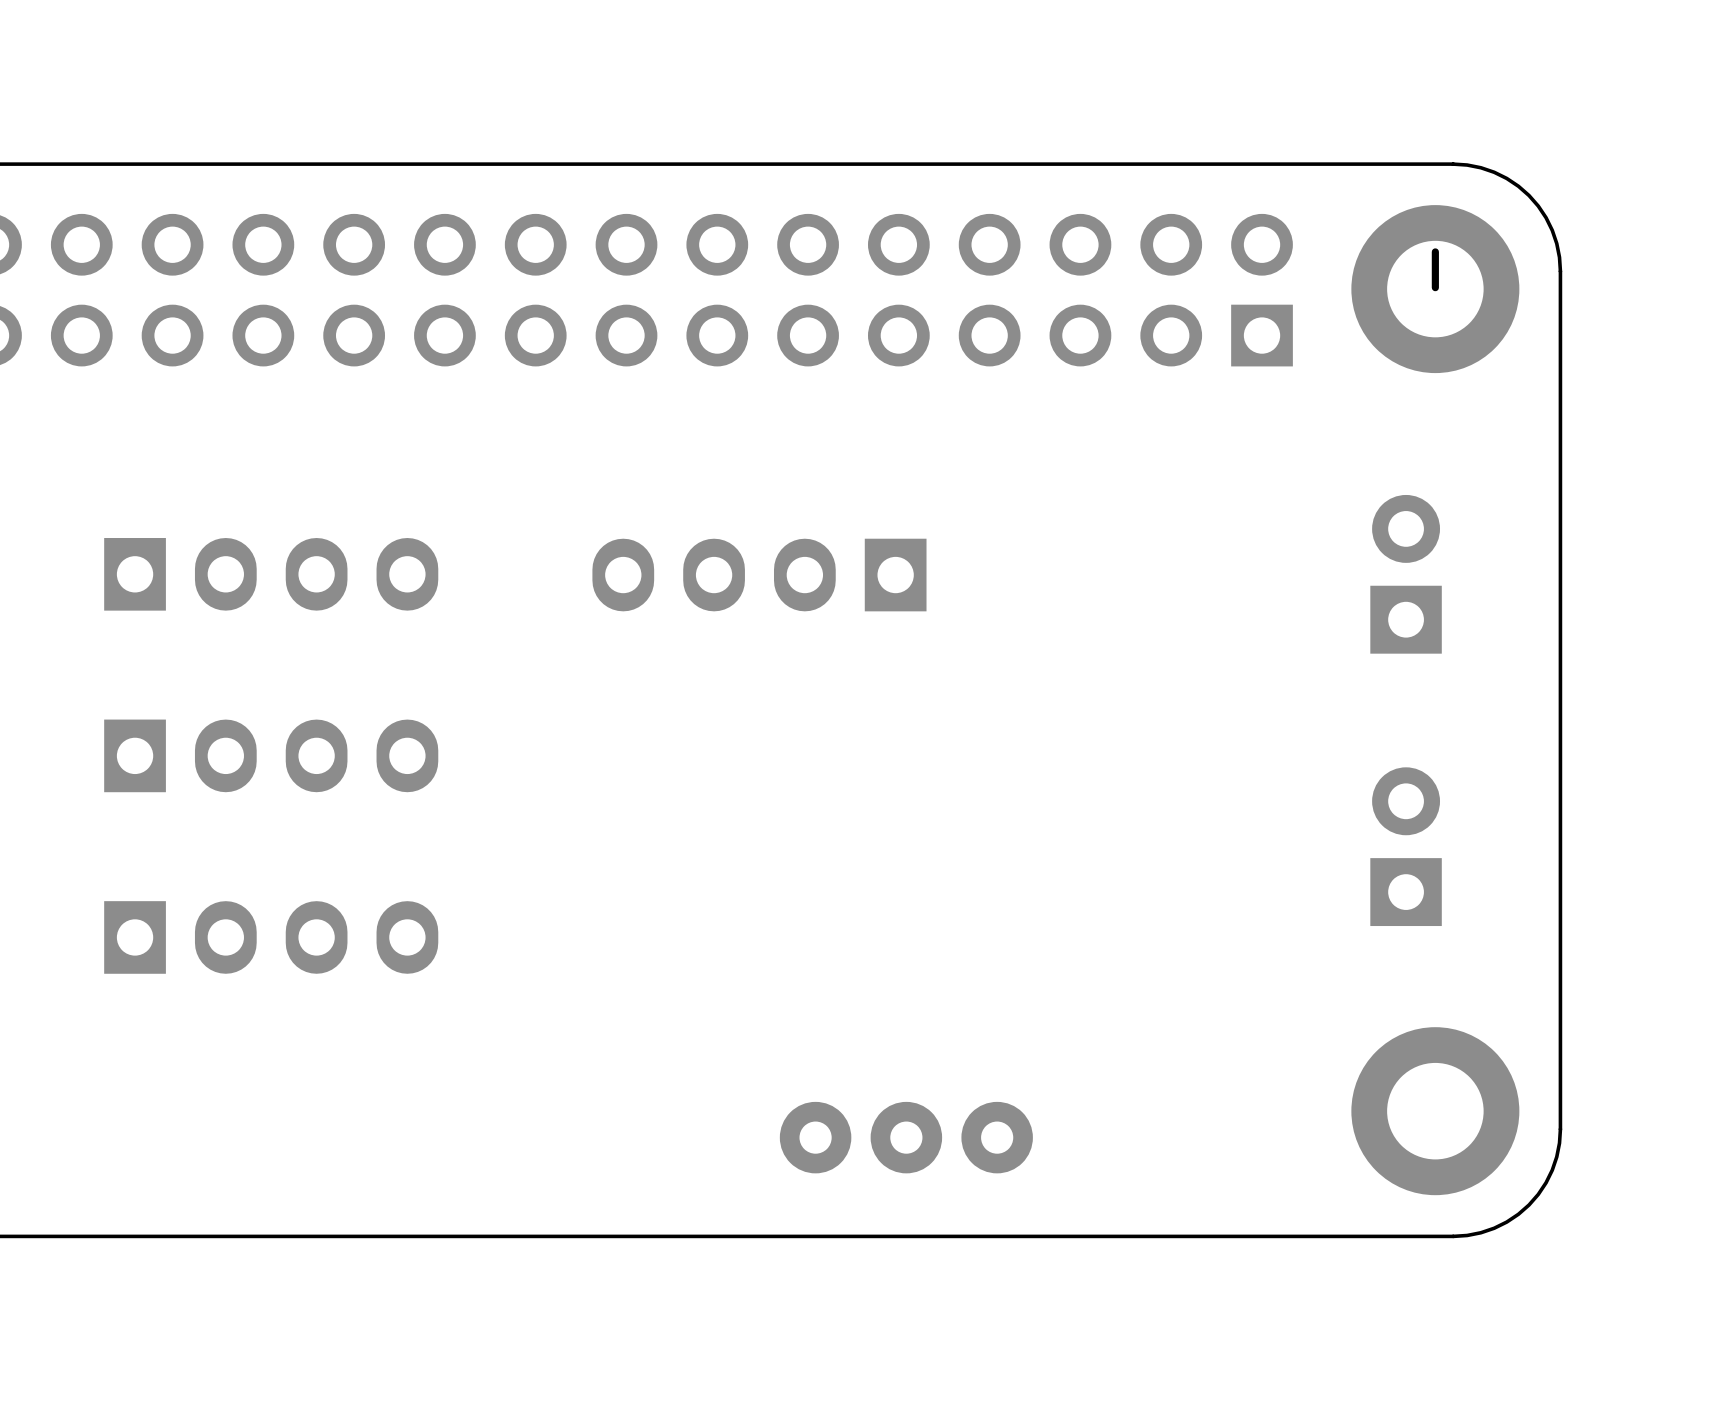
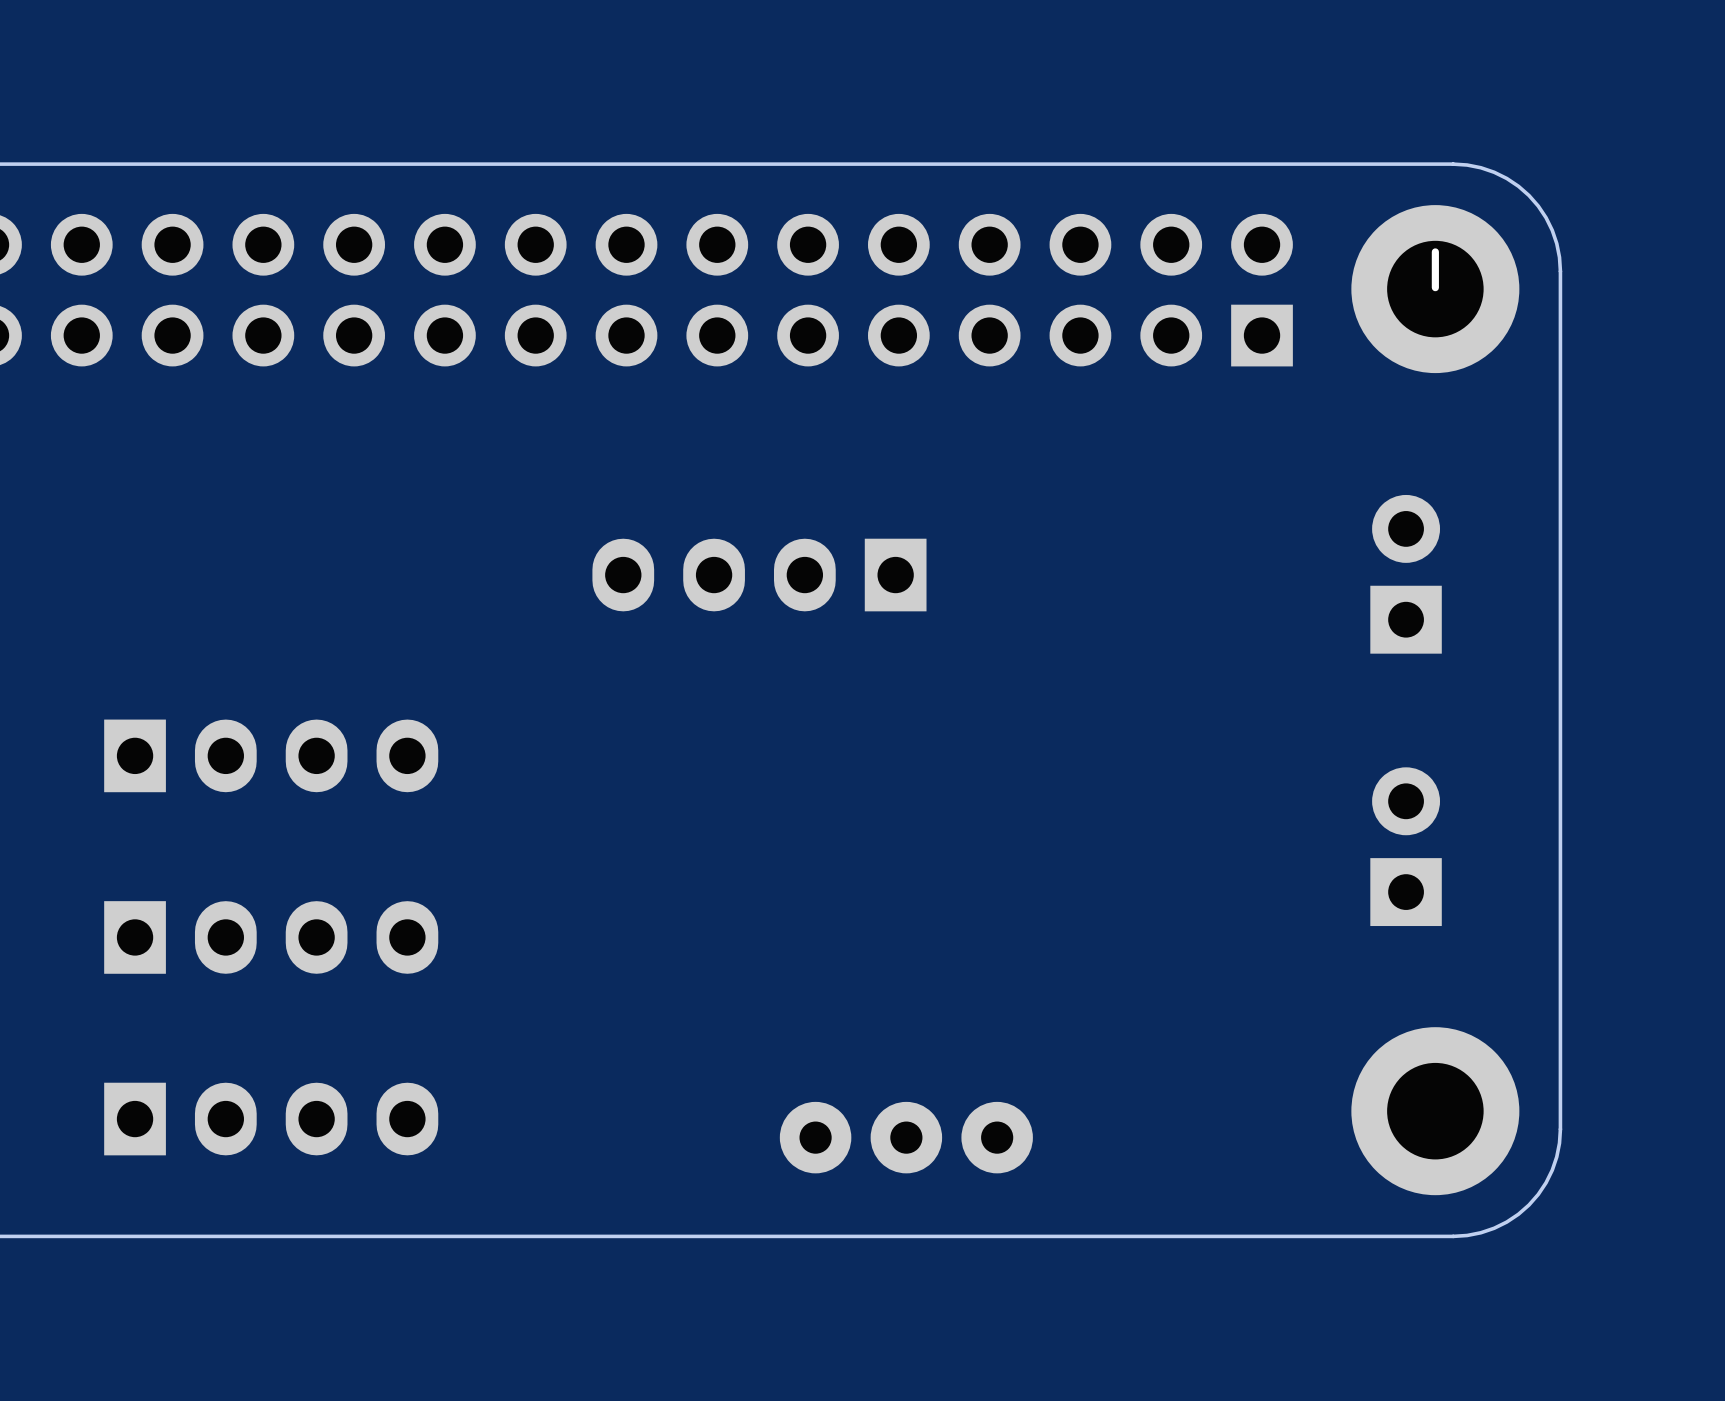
part position: (271, 574) -> (271, 1119)

